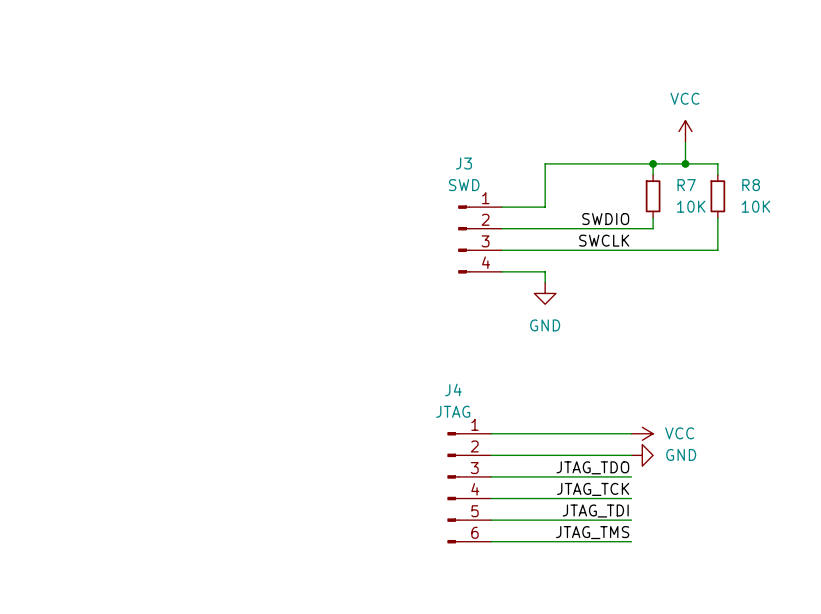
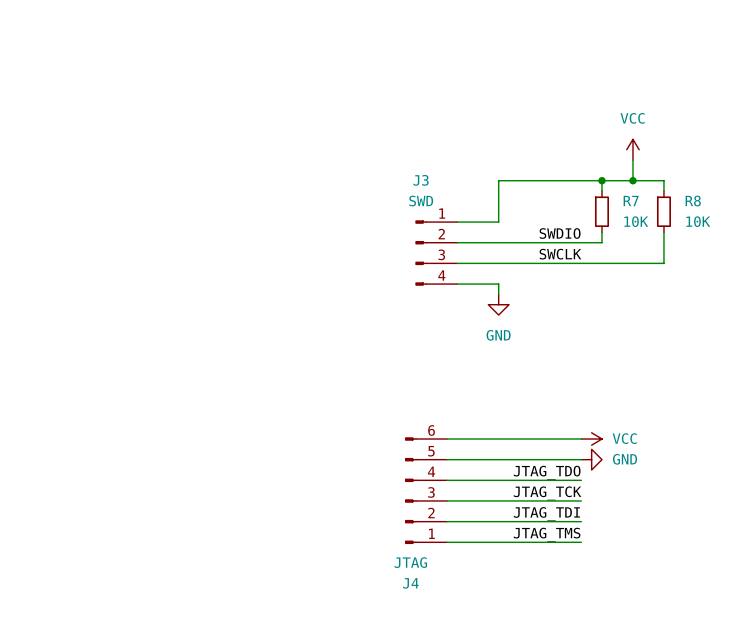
J4 flip: as is (453, 487) -> up-down (410, 490)

